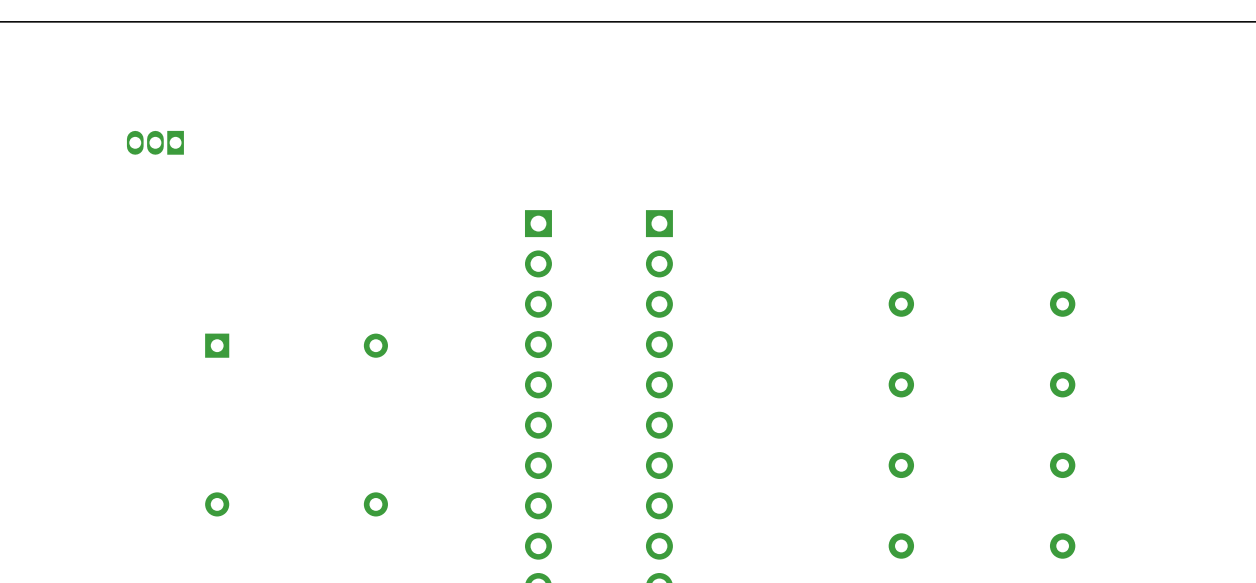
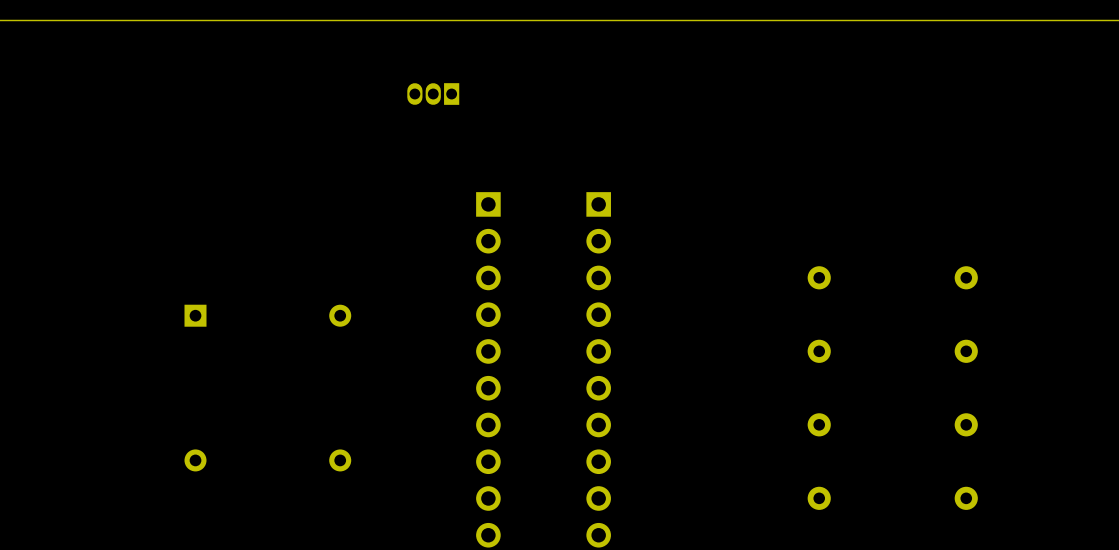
part position: (155, 142) -> (433, 94)

